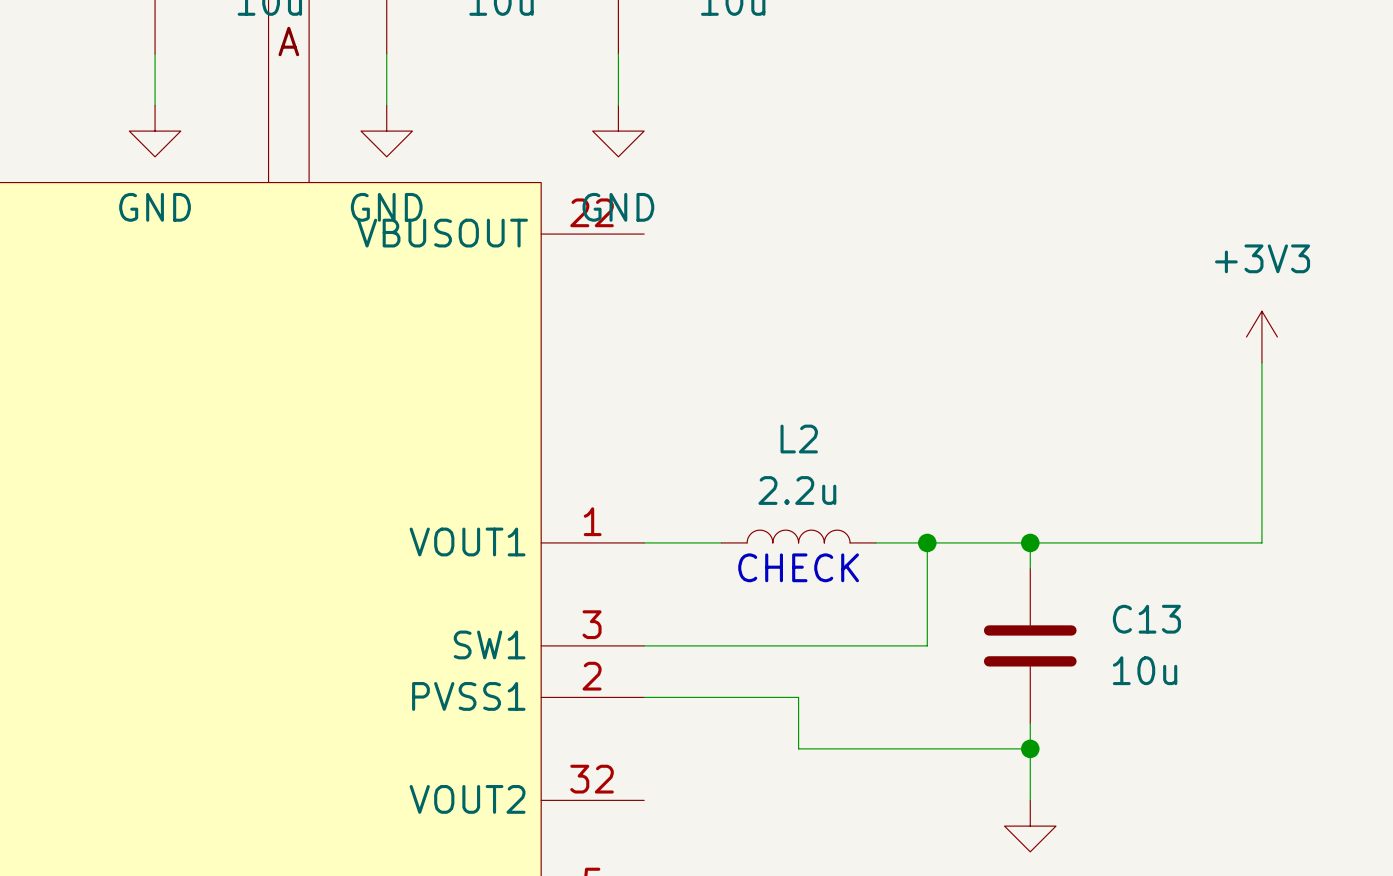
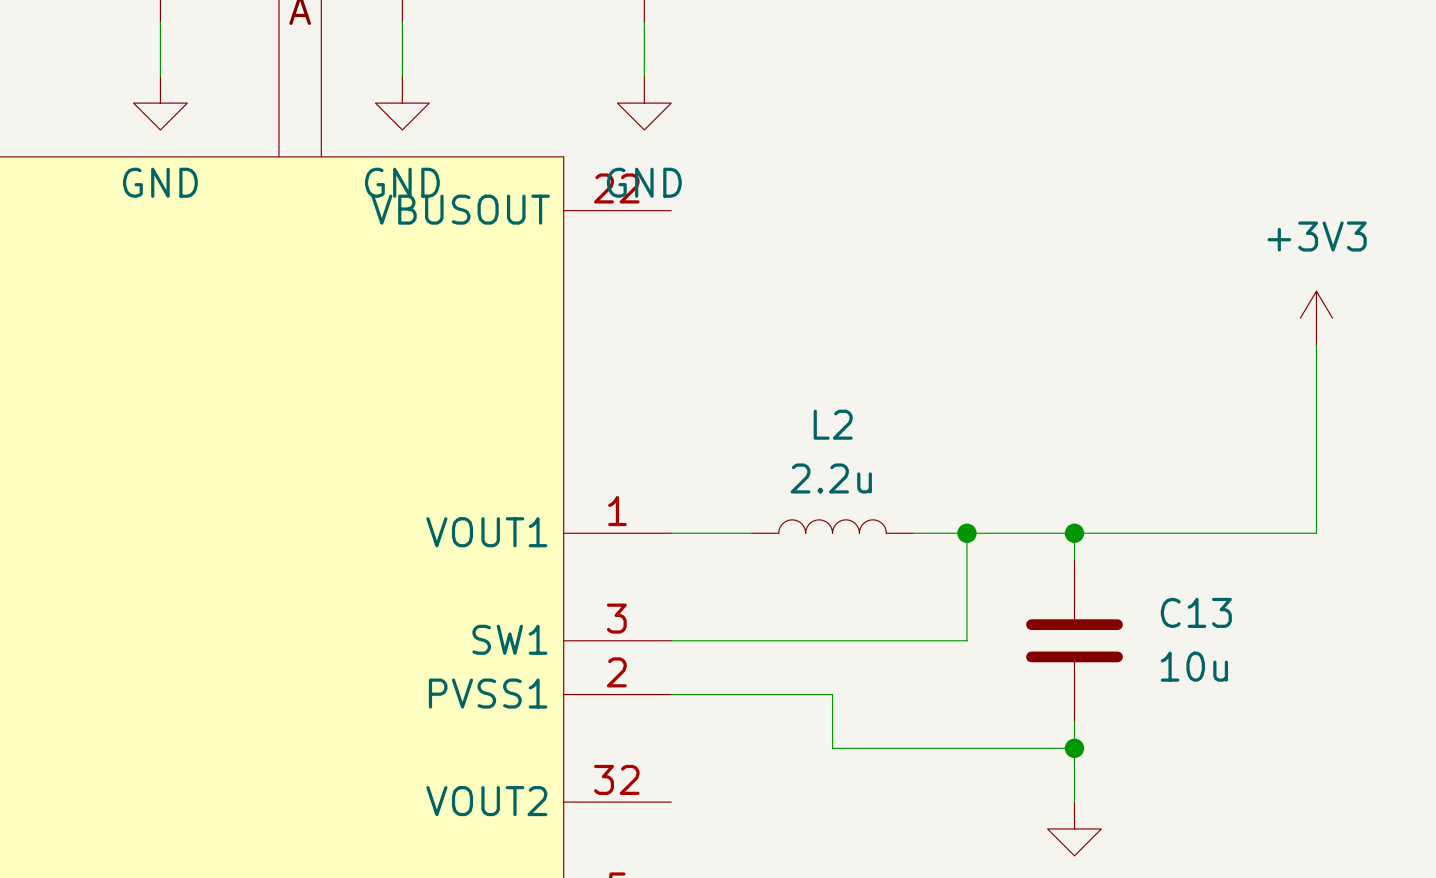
text: CHECK (798, 567) -> none

